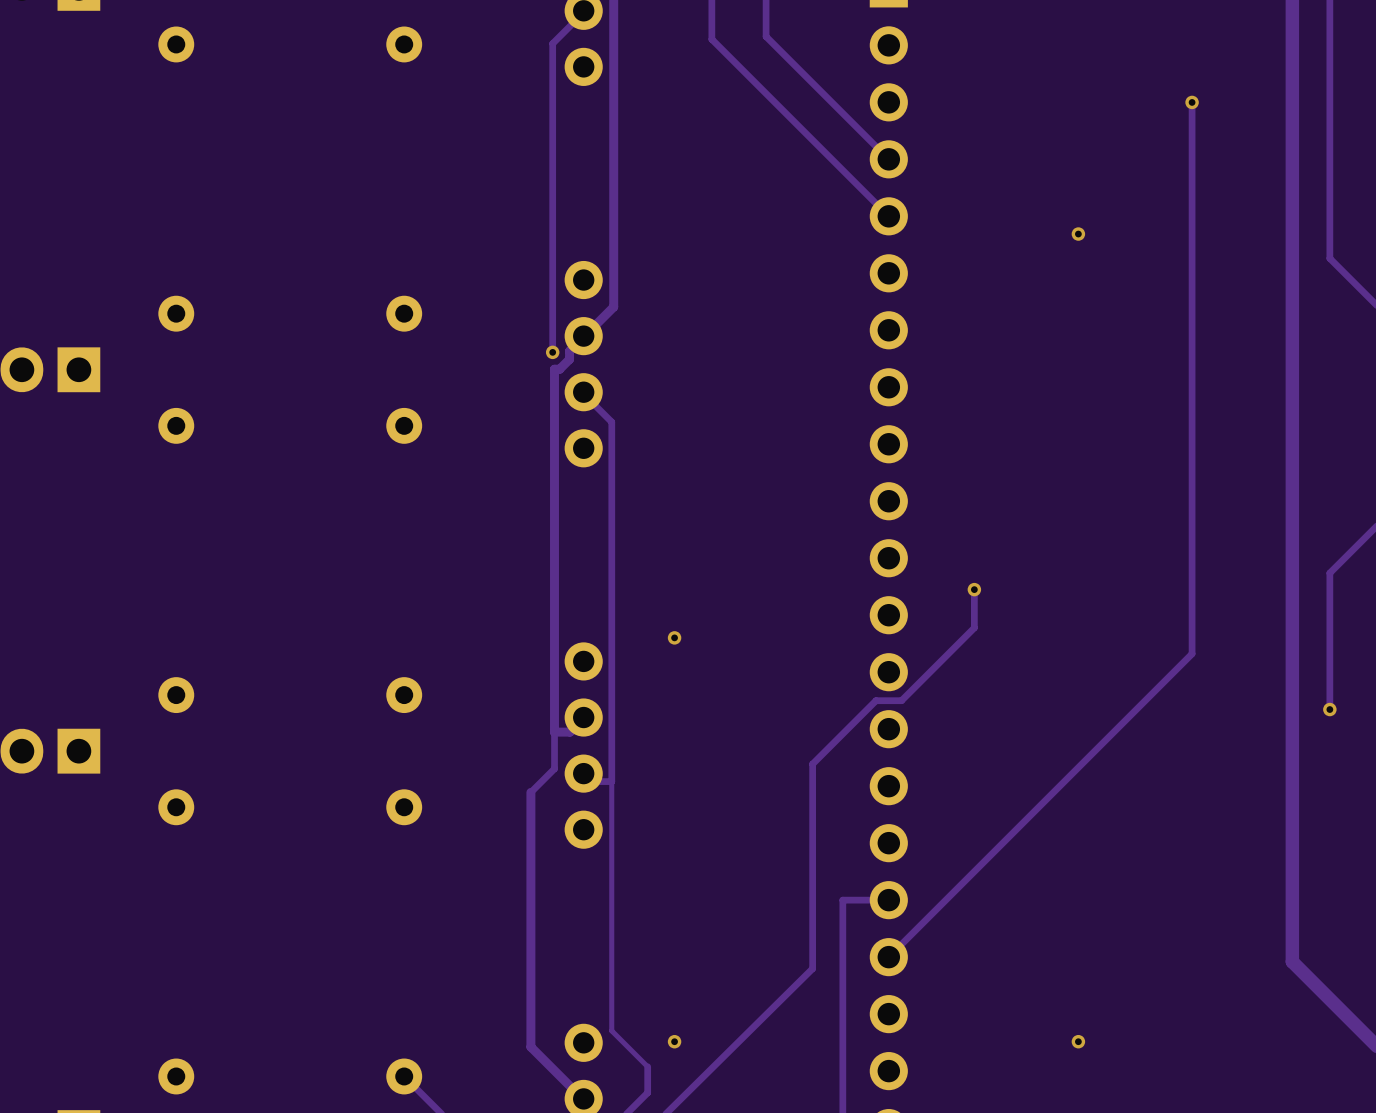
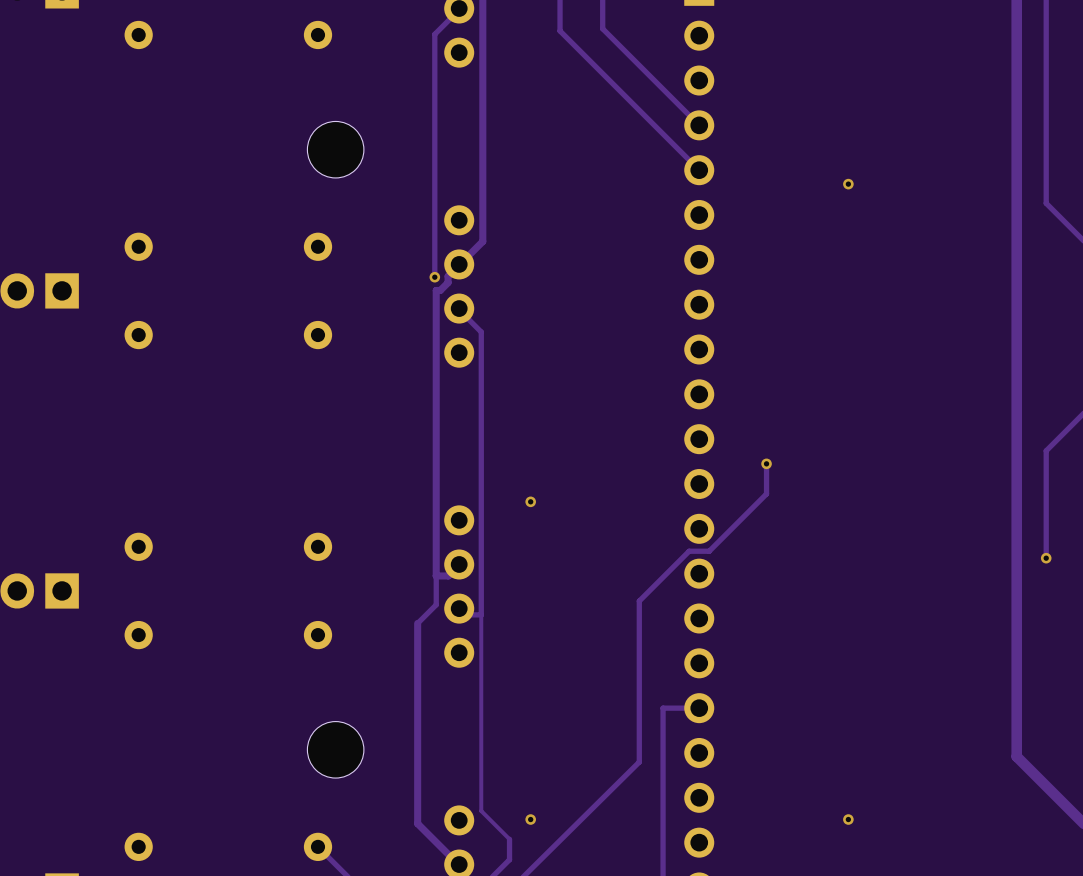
track: (1192, 102) (1192, 653) (888, 957) -> none
via: (1192, 102) -> none
part: none -> (335, 149)
part: none -> (335, 749)

